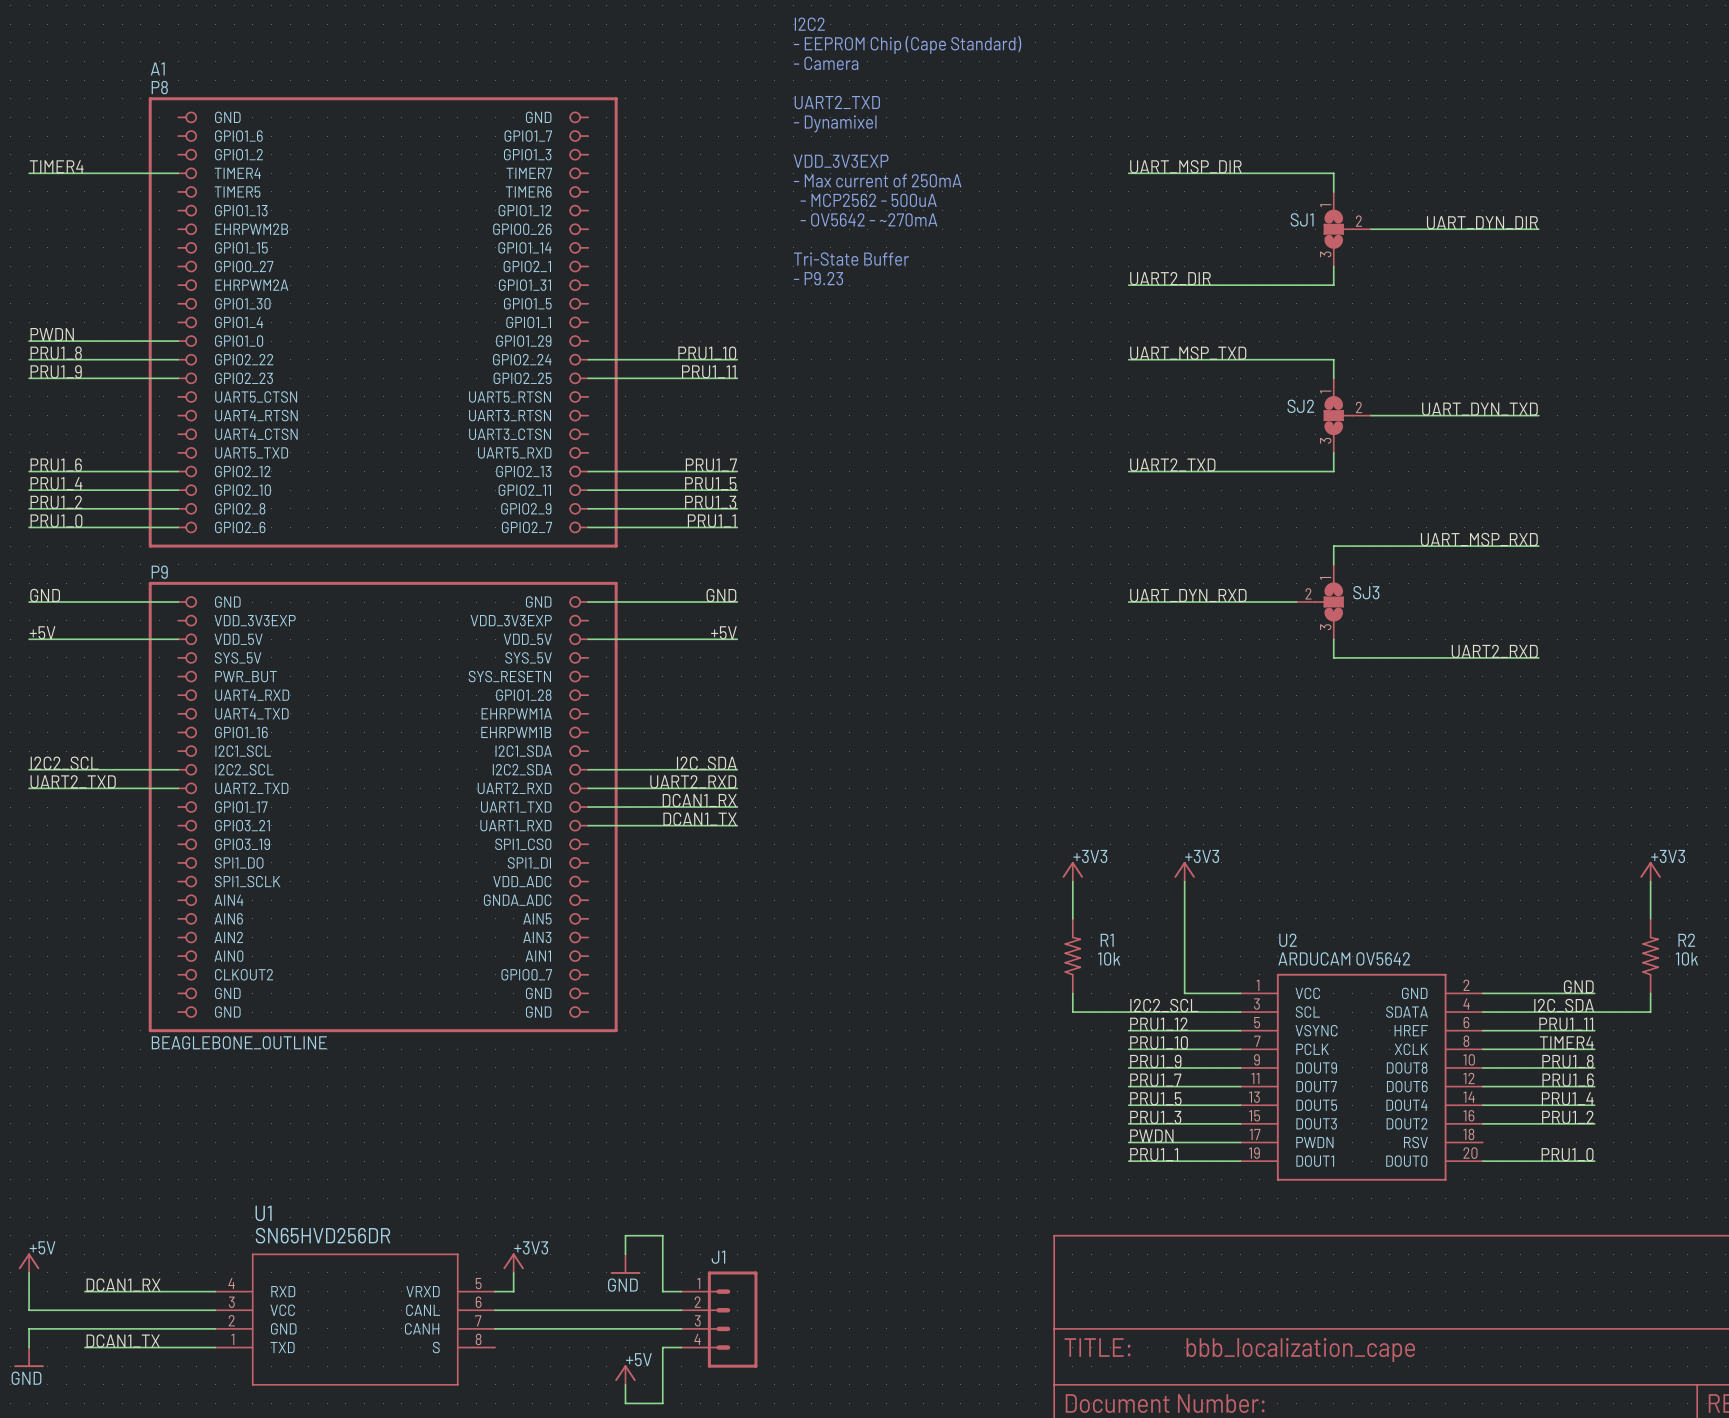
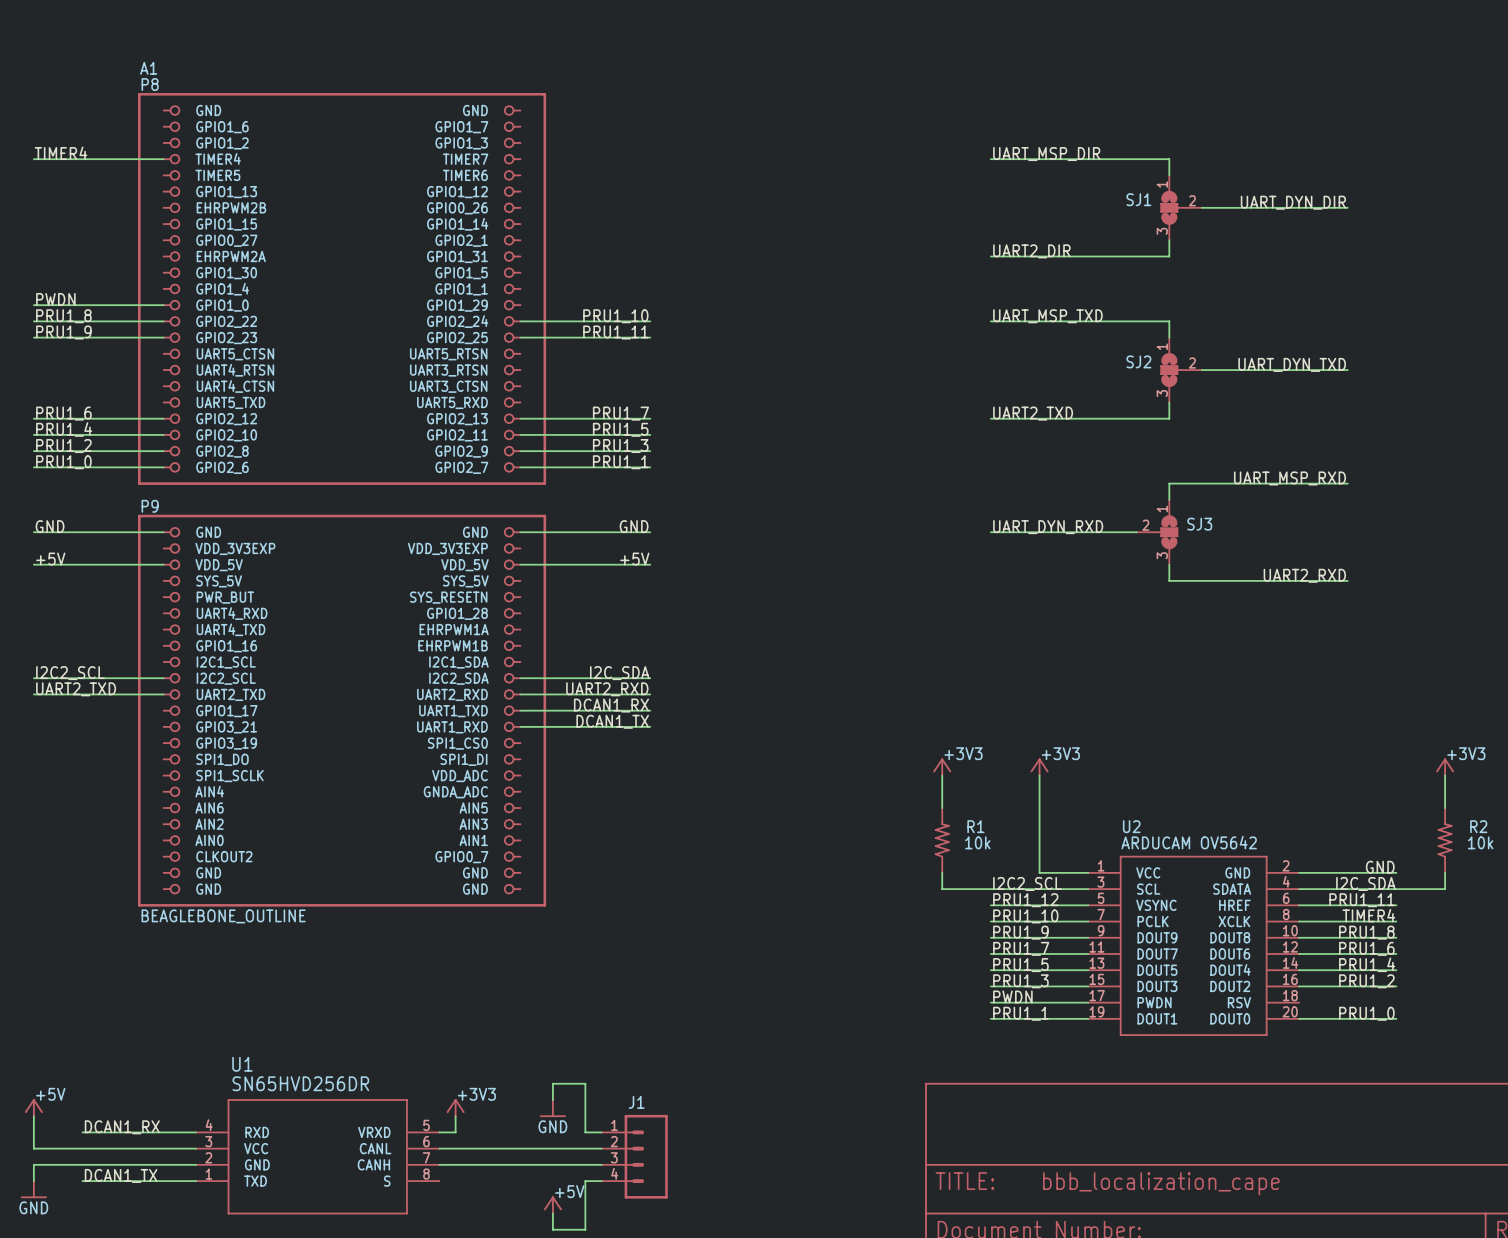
text: I2C2 (809, 24) -> none
text: - EEPROM Chip (Cape Standard) (907, 45) -> none
text: - Camera (826, 63) -> none
text: UART2_TXD (837, 102) -> none
text: - Dynamixel (835, 123) -> none
text: VDD_3V3EXP (841, 161) -> none
text: - Max current of 250mA (877, 180) -> none
text: - MCP2562 - 500uA (868, 200) -> none
text: - OV5642 - ~270mA (868, 219) -> none
text: Tri-State Buffer (851, 259) -> none
text: - P9.23 (818, 278) -> none

